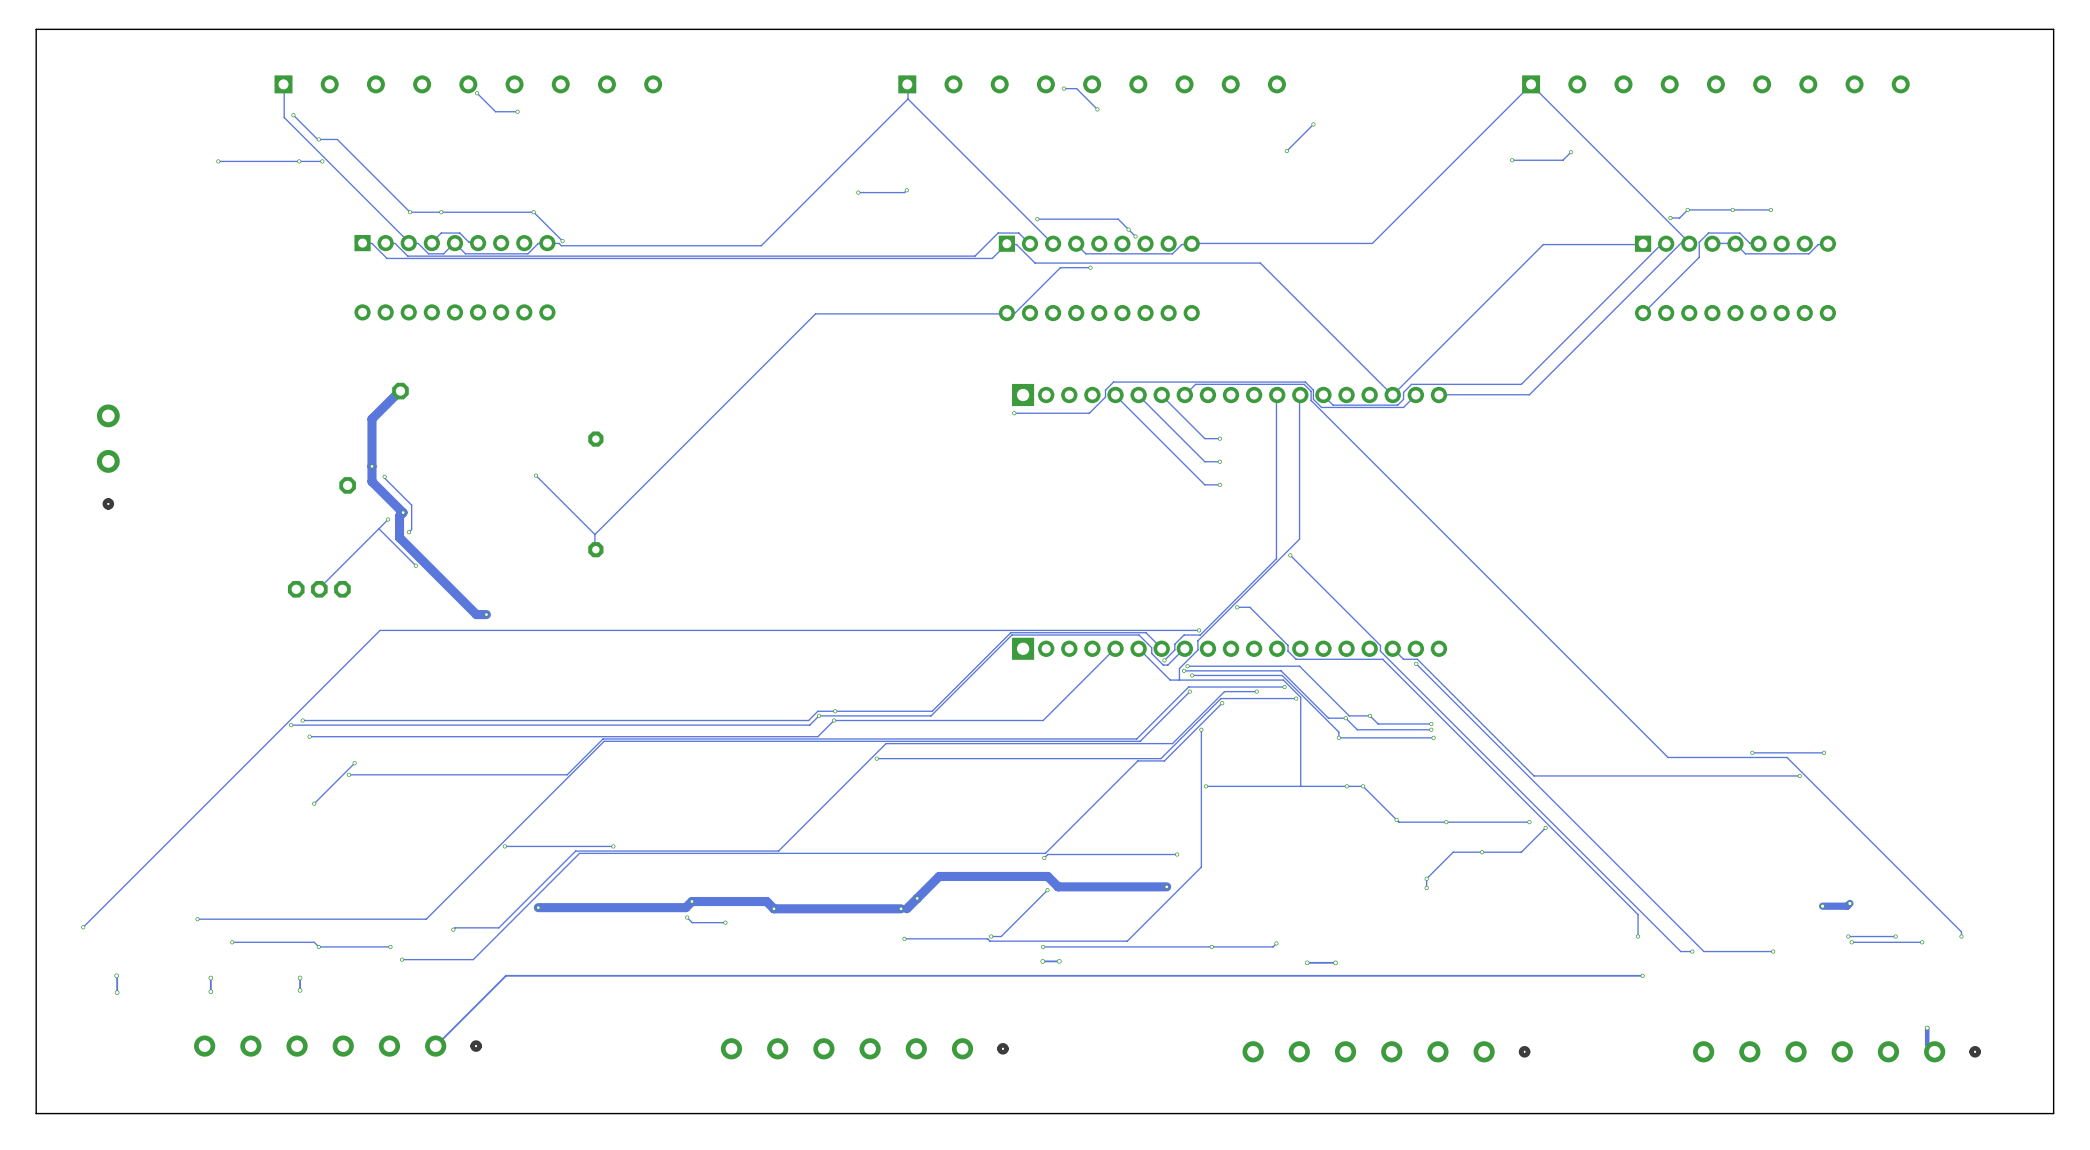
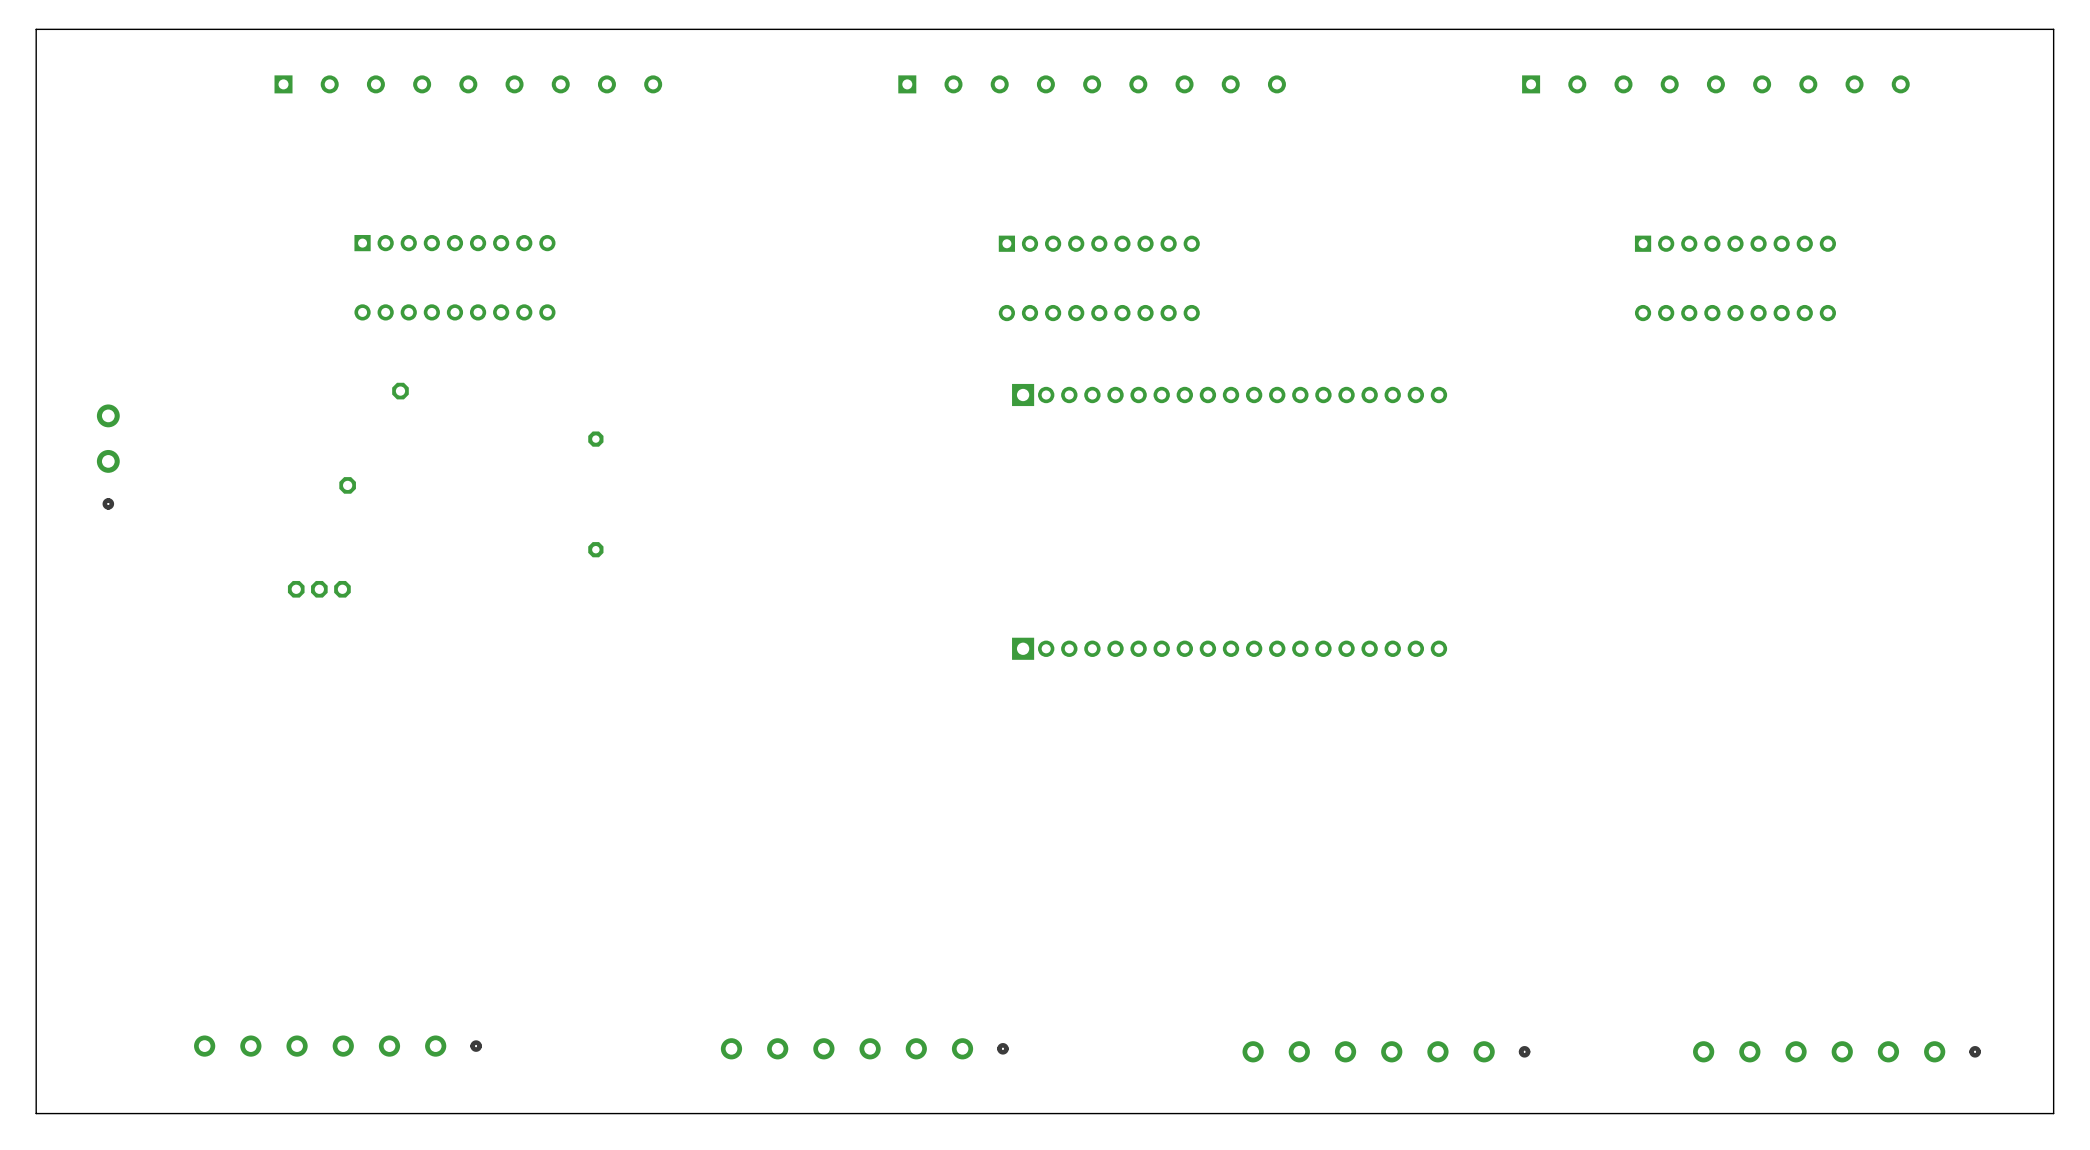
track: (283, 84) (284, 117) (408, 243) (418, 243) (428, 253) (443, 253) (454, 243) (465, 253) (527, 253) (538, 243) (547, 243) (559, 243) (561, 245) (761, 245) (907, 99) -> none
track: (907, 84) (907, 99) -> none
track: (1063, 88) (1076, 88) (1097, 109) -> none
via: (1063, 88) -> none
track: (477, 93) (495, 111) (517, 111) -> none
via: (477, 93) -> none
track: (907, 99) (1053, 243) -> none
via: (1097, 109) -> none
via: (517, 111) -> none
track: (293, 115) (317, 139) (337, 139) (410, 212) (533, 212) (562, 241) -> none
via: (293, 115) -> none
track: (1313, 124) (1286, 151) -> none
via: (1313, 124) -> none
via: (318, 139) -> none
via: (1286, 151) -> none
track: (1571, 152) (1562, 160) (1512, 160) -> none
via: (1571, 152) -> none
via: (1512, 160) -> none
via: (218, 161) -> none
via: (299, 161) -> none
track: (322, 161) (218, 161) -> none
via: (322, 161) -> none
track: (906, 190) (904, 192) (858, 192) -> none
via: (906, 190) -> none
via: (858, 192) -> none
via: (1687, 209) -> none
via: (1732, 209) -> none
track: (1770, 209) (1687, 209) (1679, 218) (1670, 218) -> none
via: (1770, 209) -> none
via: (410, 212) -> none
via: (441, 212) -> none
via: (533, 212) -> none
via: (1670, 218) -> none
track: (1037, 219) (1118, 219) (1135, 236) -> none
via: (1037, 219) -> none
via: (1128, 229) -> none
via: (1135, 236) -> none
via: (562, 241) -> none
track: (362, 243) (371, 243) (386, 258) (992, 258) (1006, 243) (1016, 244) (1035, 263) (1260, 263) (1392, 395) (1543, 244) (1643, 243) -> none
track: (385, 243) (395, 243) (407, 256) (974, 256) (998, 233) (1018, 233) (1030, 243) -> none
track: (478, 243) (469, 242) (459, 233) (441, 233) (431, 243) -> none
track: (1076, 243) (1085, 253) (1172, 253) (1181, 244) (1192, 243) (1372, 243) (1531, 84) (1690, 243) (1685, 238) (1529, 394) (1438, 395) -> none
track: (1666, 243) (1661, 244) (1521, 384) (1411, 384) (1403, 392) (1403, 399) (1397, 405) (1333, 405) (1323, 395) -> none
track: (1758, 243) (1750, 243) (1739, 233) (1708, 233) (1699, 242) (1699, 257) (1643, 313) -> none
track: (1827, 243) (1818, 244) (1809, 253) (1745, 253) (1735, 243) (1712, 243) -> none
track: (1090, 267) (1060, 267) (1015, 312) (815, 313) (594, 534) -> none
via: (1090, 267) -> none
track: (400, 391) (371, 419) (371, 481) (403, 512) (399, 516) (399, 537) (476, 614) (486, 614) -> none
track: (1115, 395) (1204, 484) (1219, 484) -> none
track: (1138, 395) (1204, 461) (1219, 461) -> none
track: (1161, 395) (1204, 438) (1219, 438) -> none
track: (1184, 395) (1195, 384) (1304, 384) (1311, 391) (1311, 400) (1668, 757) (1787, 757) (1961, 931) (1961, 936) -> none
track: (1277, 395) (1276, 558) (1200, 635) (1184, 635) (1174, 644) (1174, 650) (1164, 660) -> none
track: (1300, 395) (1299, 539) (1197, 640) (1197, 650) (1179, 668) (1179, 680) -> none
track: (1415, 395) (1403, 407) (1321, 407) (1313, 399) (1313, 390) (1305, 382) (1113, 382) (1105, 390) (1105, 397) (1089, 413) (1014, 413) -> none
via: (1014, 413) -> none
via: (1219, 438) -> none
via: (1219, 461) -> none
via: (371, 466) -> none
track: (536, 475) (594, 534) -> none
via: (536, 475) -> none
track: (384, 476) (411, 505) (411, 529) (408, 532) -> none
via: (384, 476) -> none
via: (1219, 484) -> none
via: (403, 512) -> none
track: (388, 519) (319, 589) -> none
via: (388, 519) -> none
track: (378, 528) (415, 565) -> none
via: (408, 532) -> none
track: (594, 534) (595, 549) -> none
track: (1290, 555) (1380, 645) (1380, 651) (1680, 951) (1692, 951) -> none
via: (1290, 555) -> none
via: (415, 565) -> none
track: (1237, 607) (1249, 607) (1288, 645) (1288, 651) (1296, 659) (1382, 659) (1638, 914) (1638, 936) -> none
via: (1237, 607) -> none
via: (486, 614) -> none
track: (1199, 630) (380, 630) (83, 927) -> none
via: (1199, 630) -> none
track: (1115, 648) (1043, 720) (834, 720) (817, 736) (309, 736) -> none
track: (1138, 648) (1170, 680) (1283, 680) (1300, 697) (1300, 786) -> none
track: (1161, 648) (1145, 632) (1010, 632) (932, 711) (817, 711) (808, 720) (302, 720) -> none
track: (1184, 648) (1167, 665) (1163, 665) (1151, 653) (1151, 647) (1139, 635) (1011, 635) (931, 715) (819, 715) (809, 725) (291, 725) -> none
track: (1392, 648) (1403, 659) (1417, 659) (1534, 775) (1799, 775) -> none
via: (1164, 660) -> none
track: (1416, 663) (1703, 951) (1773, 951) -> none
via: (1416, 663) -> none
track: (1187, 666) (1299, 666) (1349, 715) (1370, 715) (1378, 723) (1431, 723) -> none
via: (1187, 666) -> none
track: (1184, 670) (1281, 670) (1328, 718) (1345, 718) (1357, 729) (1431, 729) -> none
via: (1184, 670) -> none
track: (1192, 675) (1282, 675) (1338, 732) (1338, 737) (1433, 737) -> none
via: (1192, 675) -> none
track: (1284, 687) (1188, 687) (1136, 738) (603, 738) (567, 774) (348, 774) -> none
via: (1284, 687) -> none
track: (1189, 691) (1140, 741) (604, 741) (426, 919) (197, 919) -> none
via: (1189, 691) -> none
track: (1256, 691) (1224, 691) (1172, 743) (886, 743) (778, 851) (575, 851) (498, 927) (455, 927) (453, 929) -> none
via: (1256, 691) -> none
track: (1296, 698) (1221, 698) (1160, 758) (876, 758) -> none
via: (1296, 698) -> none
track: (1222, 703) (1164, 760) (1137, 760) (1045, 853) (579, 853) (473, 959) (402, 959) -> none
via: (1222, 703) -> none
via: (835, 711) -> none
via: (819, 715) -> none
via: (1370, 715) -> none
via: (1345, 718) -> none
via: (302, 720) -> none
via: (834, 720) -> none
via: (1431, 723) -> none
via: (291, 725) -> none
track: (1201, 729) (1201, 867) (1127, 941) (904, 938) -> none
via: (1201, 729) -> none
via: (1431, 729) -> none
via: (309, 736) -> none
via: (1338, 737) -> none
via: (1433, 737) -> none
via: (1752, 752) -> none
track: (1824, 752) (1752, 752) -> none
via: (1824, 752) -> none
via: (876, 758) -> none
track: (354, 763) (314, 803) -> none
via: (354, 763) -> none
via: (348, 774) -> none
via: (1799, 775) -> none
track: (1206, 786) (1363, 786) (1398, 822) (1529, 822) -> none
via: (1206, 786) -> none
via: (1346, 786) -> none
via: (1363, 786) -> none
via: (314, 803) -> none
via: (1396, 819) -> none
via: (1446, 822) -> none
via: (1529, 822) -> none
track: (1545, 827) (1521, 852) (1453, 852) (1426, 878) (1426, 888) -> none
via: (1545, 827) -> none
via: (504, 846) -> none
track: (613, 846) (504, 846) -> none
via: (613, 846) -> none
via: (1482, 852) -> none
track: (1177, 854) (1047, 854) (1044, 857) -> none
via: (1177, 854) -> none
via: (1044, 857) -> none
via: (1426, 878) -> none
track: (1166, 886) (1058, 886) (1047, 876) (939, 876) (906, 908) (773, 908) (766, 901) (691, 901) (685, 907) (538, 907) -> none
via: (1166, 886) -> none
via: (1426, 888) -> none
track: (1047, 890) (1001, 936) (991, 936) -> none
via: (1047, 890) -> none
via: (917, 898) -> none
via: (691, 901) -> none
track: (1849, 903) (1847, 906) (1822, 906) -> none
via: (1849, 903) -> none
via: (1822, 906) -> none
via: (538, 907) -> none
via: (773, 908) -> none
via: (901, 908) -> none
track: (687, 917) (692, 922) (725, 922) -> none
via: (687, 917) -> none
via: (197, 919) -> none
via: (725, 922) -> none
via: (83, 927) -> none
via: (453, 929) -> none
via: (991, 936) -> none
via: (1638, 936) -> none
via: (1848, 936) -> none
track: (1895, 936) (1848, 936) -> none
via: (1895, 936) -> none
via: (1961, 936) -> none
via: (904, 938) -> none
track: (232, 942) (314, 942) (318, 946) (390, 946) -> none
via: (232, 942) -> none
via: (1851, 942) -> none
track: (1922, 942) (1851, 942) -> none
via: (1922, 942) -> none
track: (1276, 943) (1273, 946) (1043, 946) -> none
via: (1276, 943) -> none
via: (318, 946) -> none
via: (390, 946) -> none
via: (1043, 946) -> none
via: (1211, 946) -> none
via: (1692, 951) -> none
via: (1773, 951) -> none
via: (402, 959) -> none
via: (1042, 961) -> none
track: (1059, 961) (1042, 961) -> none
via: (1059, 961) -> none
via: (1307, 962) -> none
track: (1335, 962) (1307, 962) -> none
via: (1335, 962) -> none
track: (116, 975) (117, 992) -> none
via: (116, 975) -> none
track: (1642, 975) (505, 975) (435, 1046) -> none
via: (1642, 975) -> none
track: (300, 977) (300, 990) -> none
via: (300, 977) -> none
track: (210, 978) (210, 991) -> none
via: (210, 978) -> none
via: (300, 990) -> none
via: (210, 991) -> none
via: (117, 992) -> none
track: (1927, 1028) (1927, 1044) (1934, 1051) -> none
via: (1927, 1028) -> none

